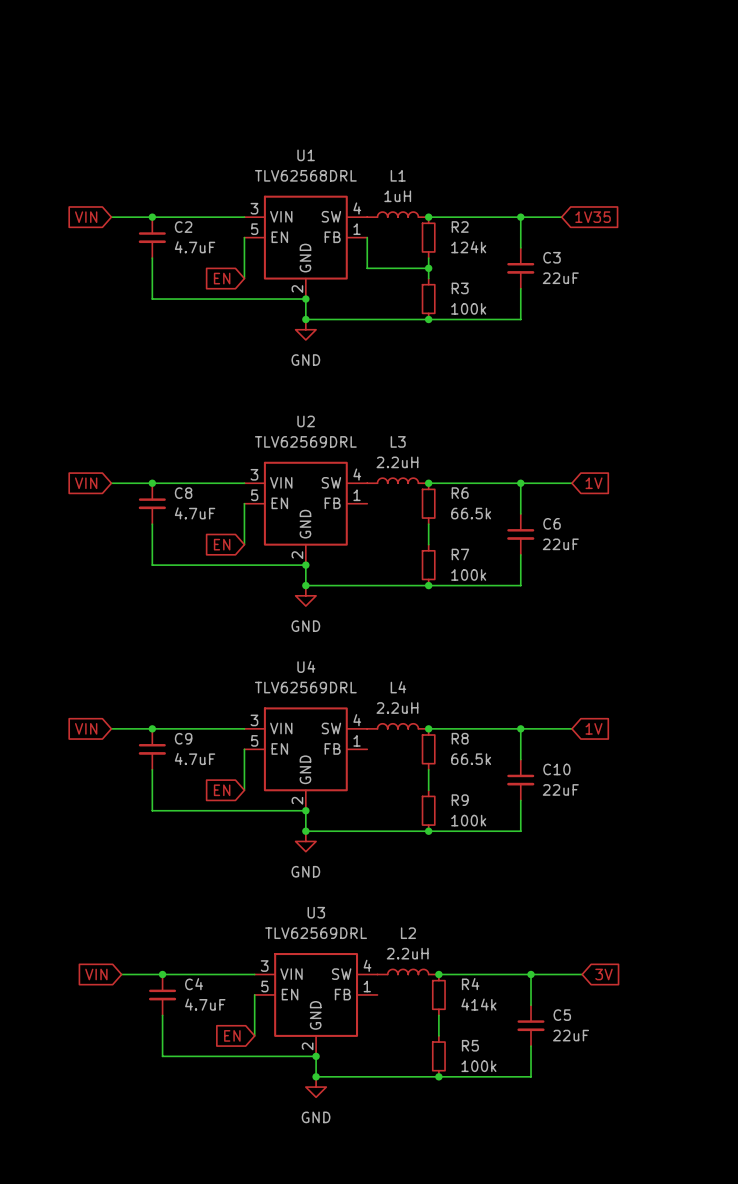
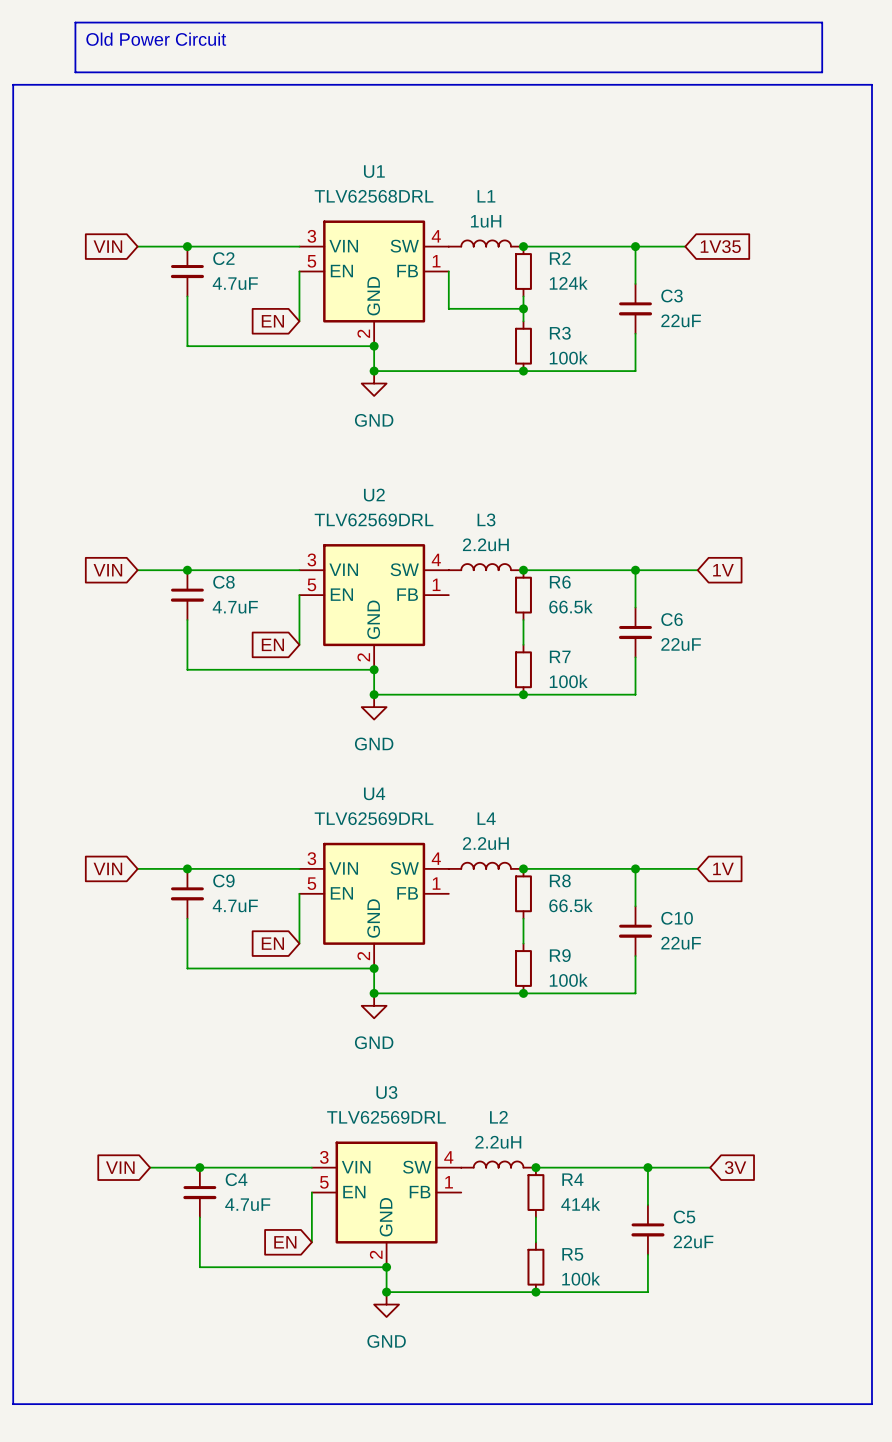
line: none -> (75, 22) (822, 22) (822, 72) (75, 72) (75, 22)
text: none -> Old Power Circuit (156, 39)
line: none -> (13, 84) (871, 84) (871, 1404) (13, 1404) (13, 84)

